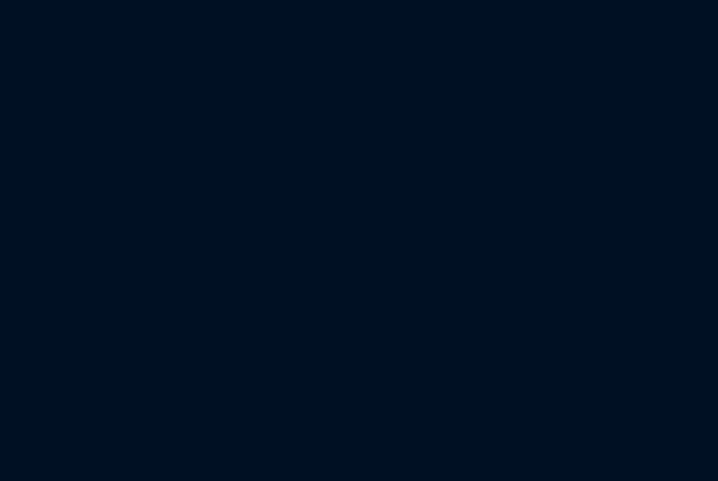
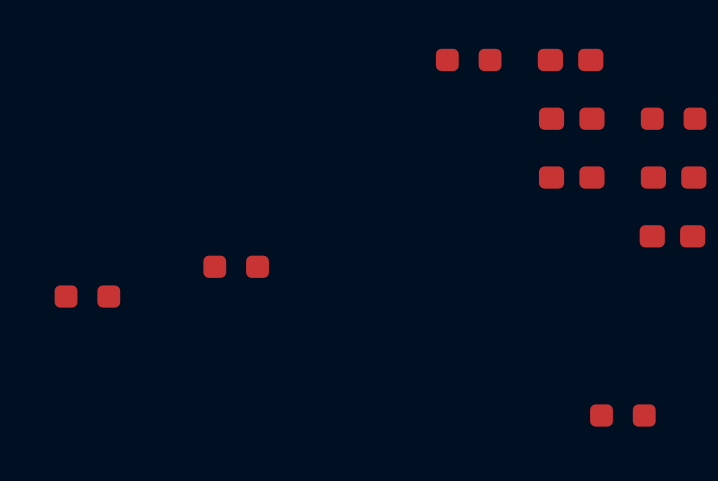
part: none -> (468, 59)
part: none -> (570, 59)
part: none -> (571, 118)
part: none -> (673, 118)
part: none -> (571, 177)
part: none -> (673, 177)
part: none -> (672, 236)
part: none -> (236, 266)
part: none -> (87, 296)
part: none -> (622, 415)

